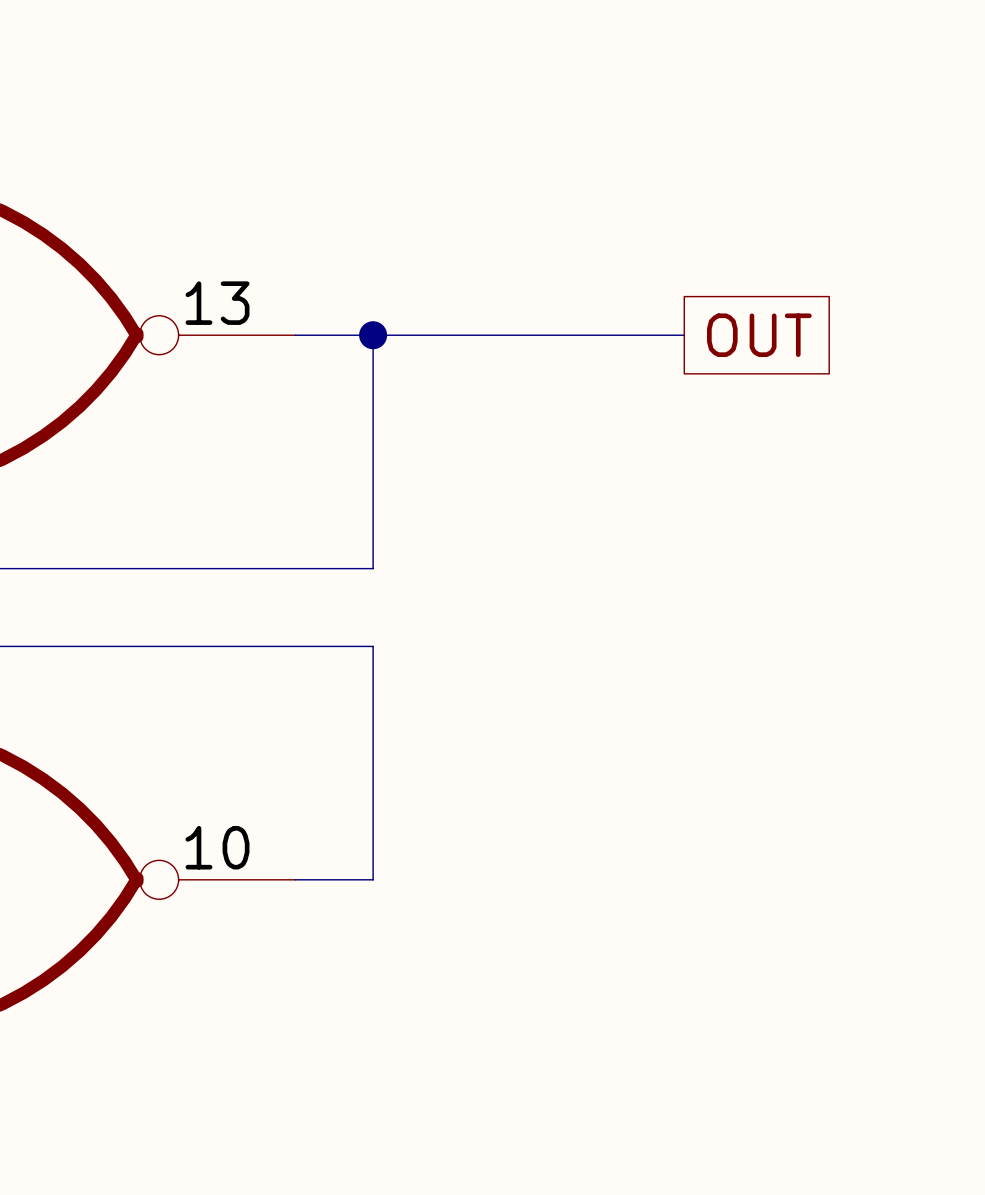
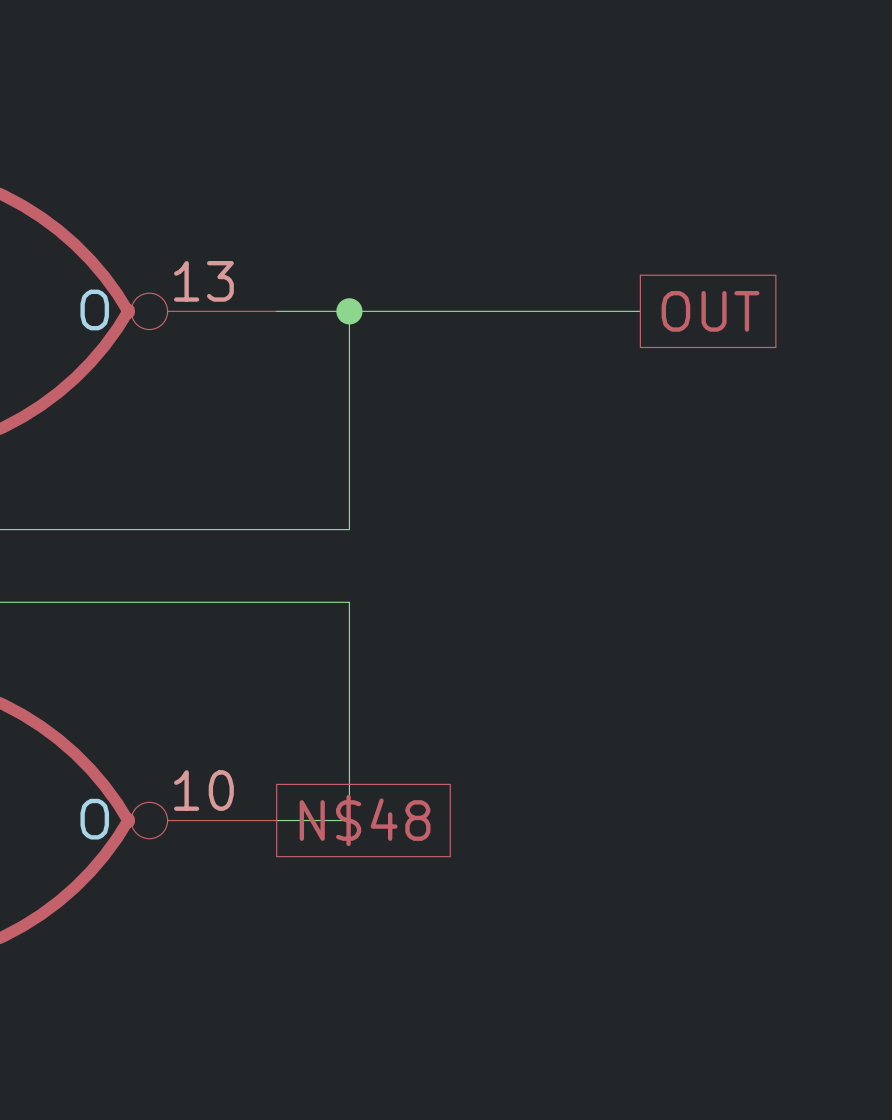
part pin name: none -> O (94, 310)
part pin name: none -> O (94, 819)
global label: none -> N$48 (365, 820)

